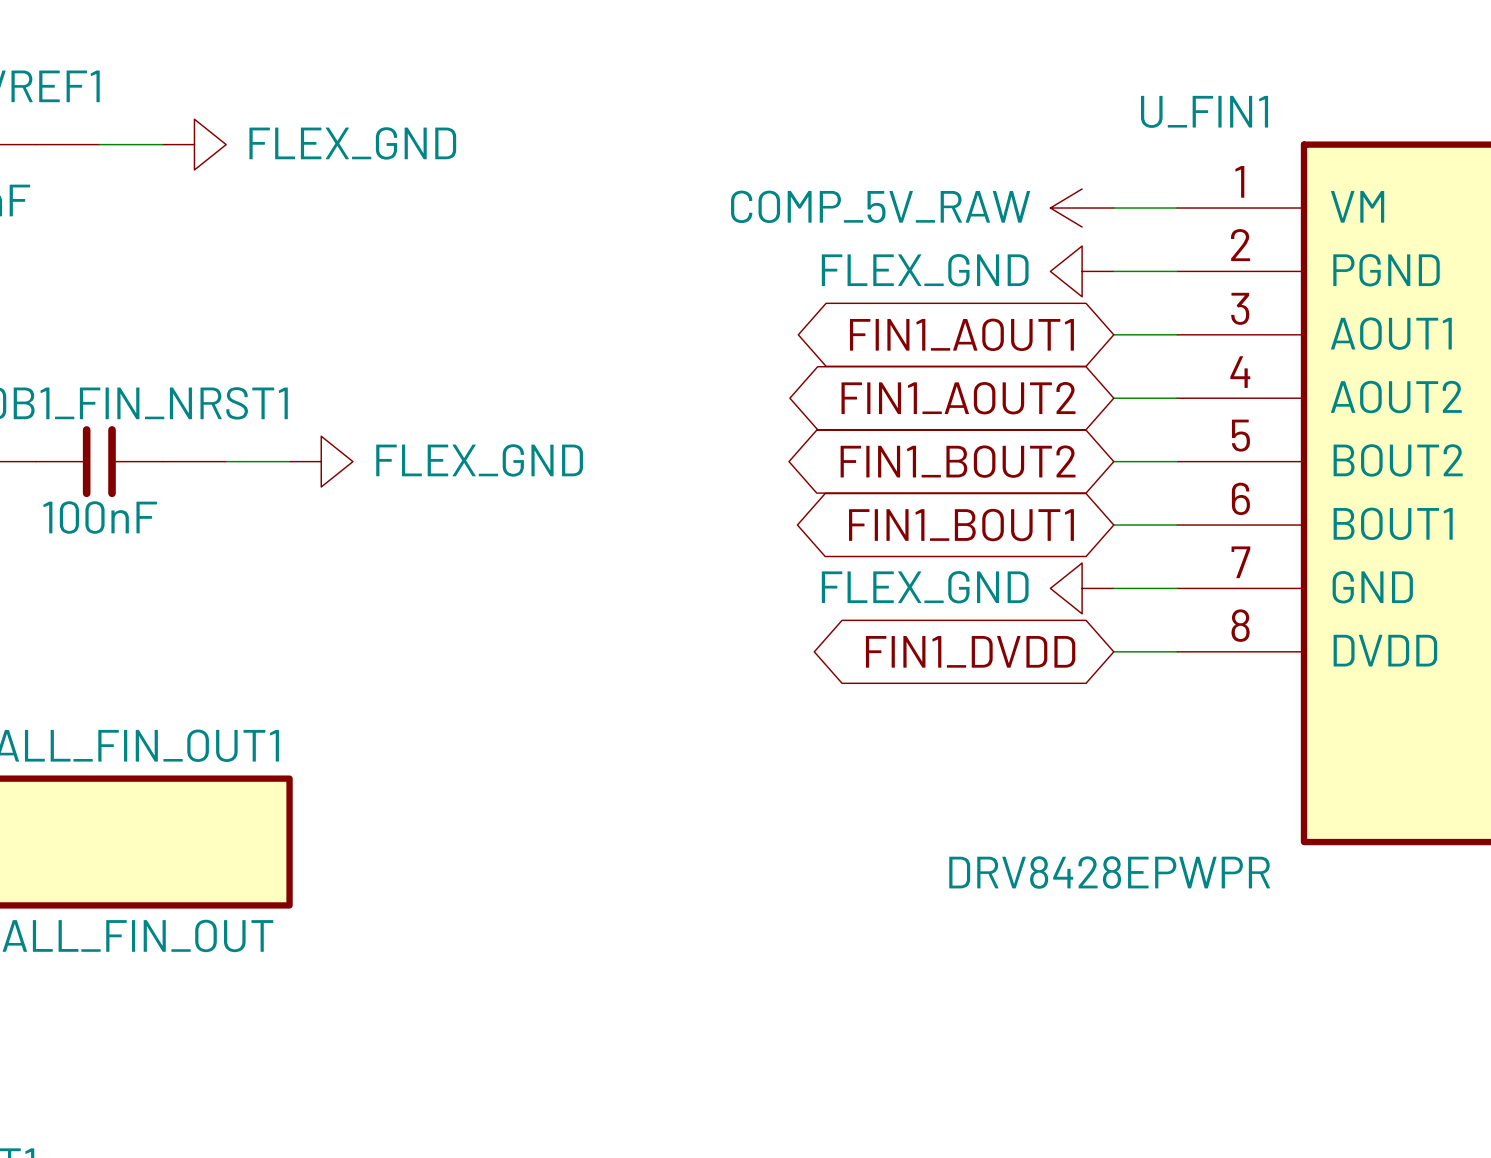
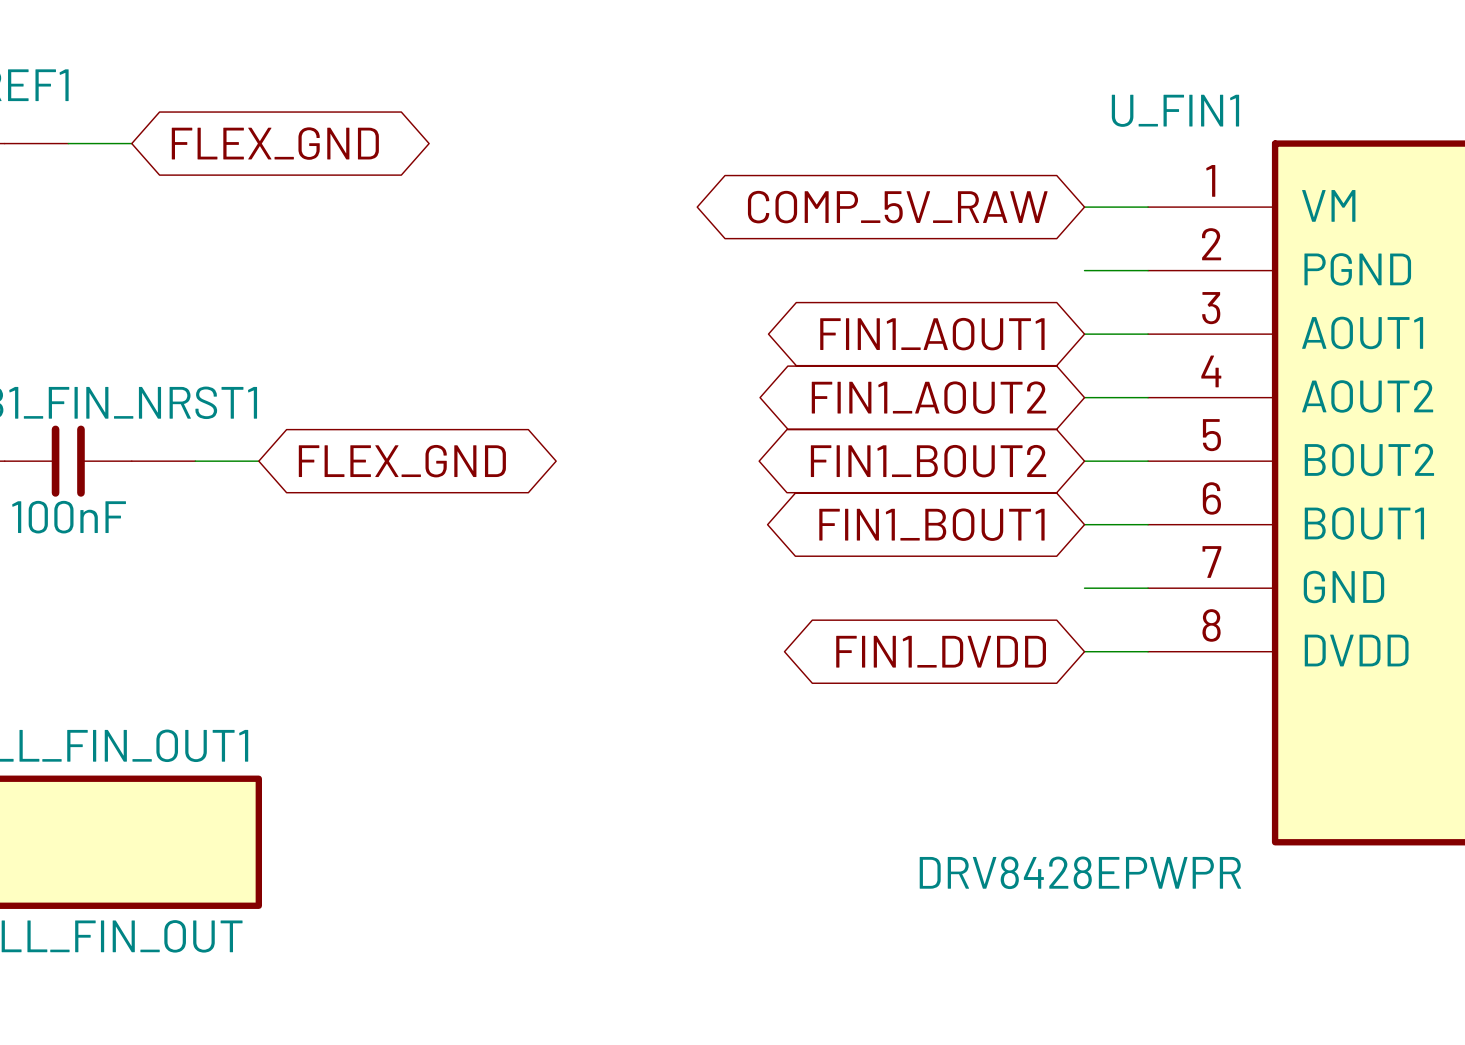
power symbol: FLEX_GND (194, 144) -> none
global label: none -> FLEX_GND (275, 143)
global label: none -> COMP_5V_RAW (897, 207)
power symbol: COMP_5V_RAW (1082, 208) -> none
power symbol: FLEX_GND (1082, 271) -> none
power symbol: FLEX_GND (321, 461) -> none
global label: none -> FLEX_GND (402, 461)
power symbol: FLEX_GND (1082, 588) -> none

